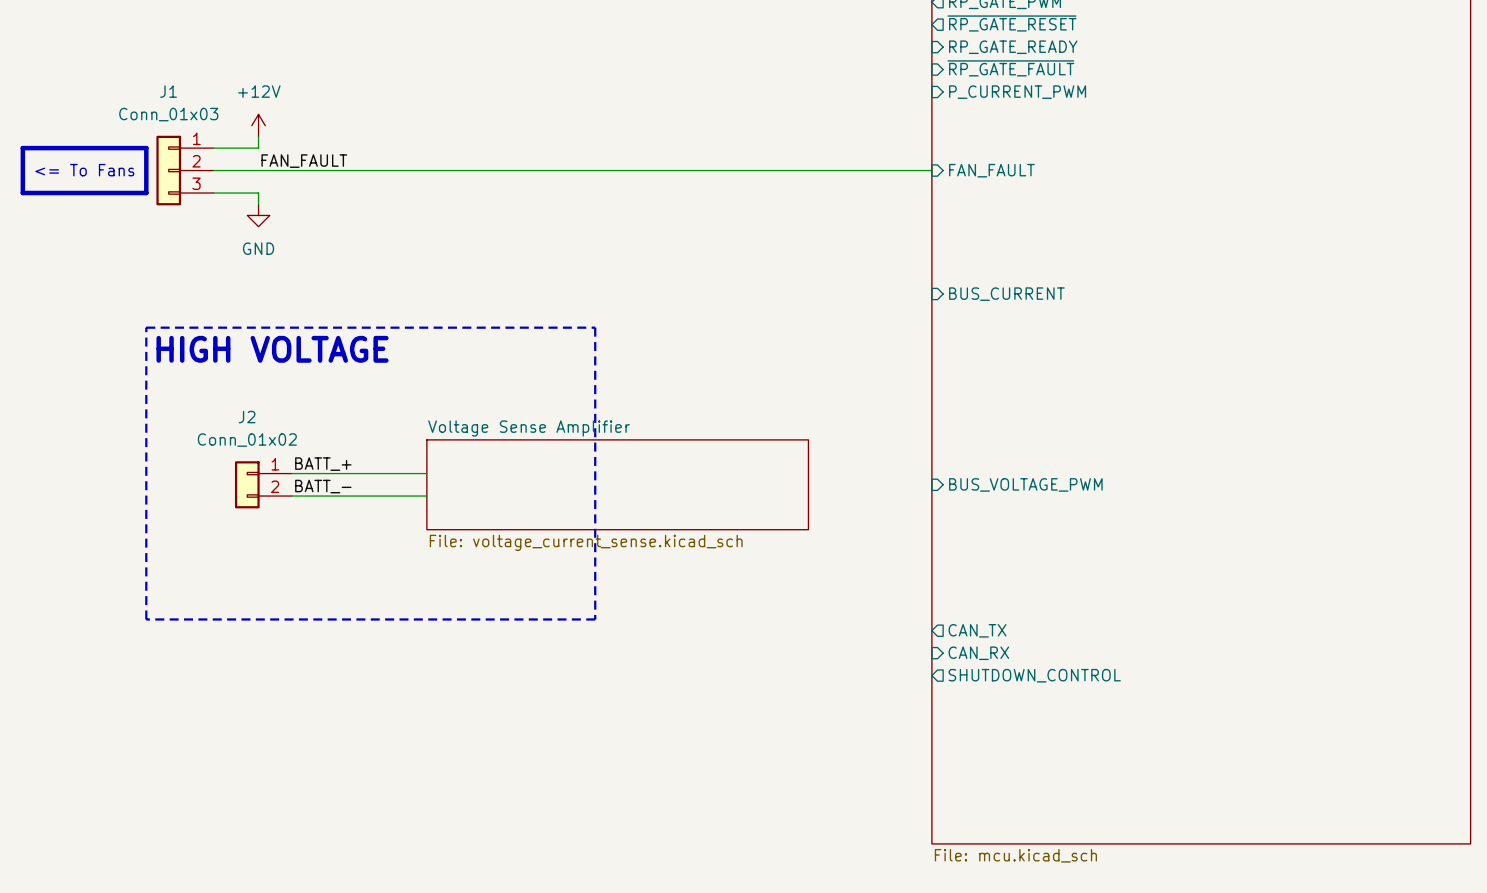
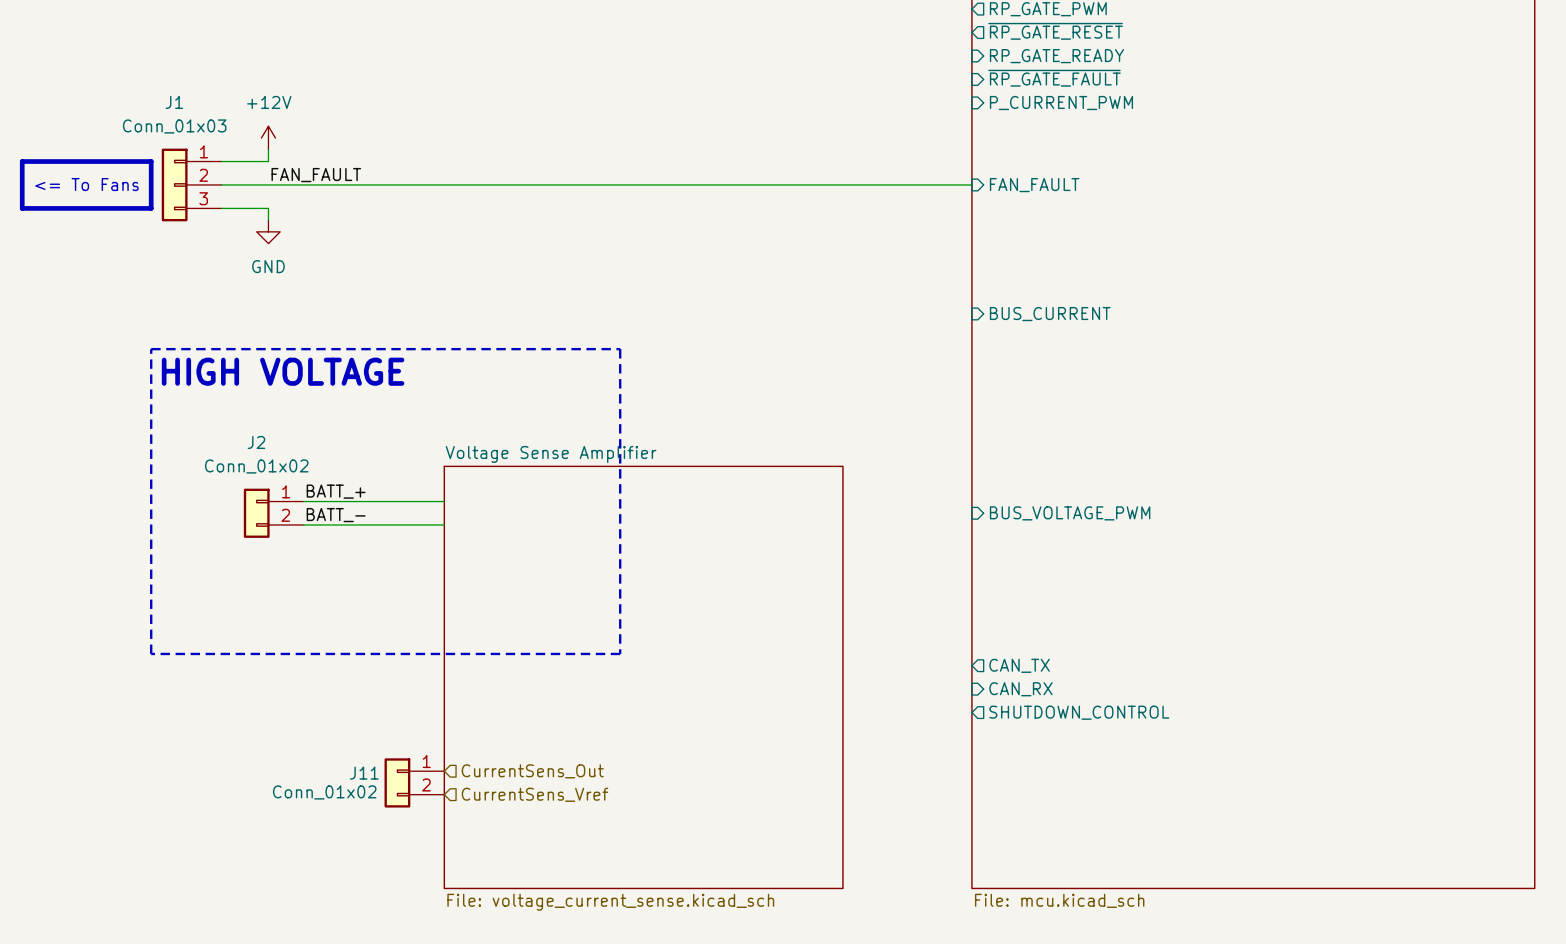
sheet Voltage Sense Amplifier: File: voltage_current_sense.kicad_sch (617, 484) -> none
sheet Voltage Sense Amplifier: none -> File: voltage_current_sense.kicad_sch (643, 677)
hierarchical label: none -> CurrentSens_Out (532, 771)
J11: none -> Conn_01x02 (414, 782)
hierarchical label: none -> CurrentSens_Vref (534, 794)

